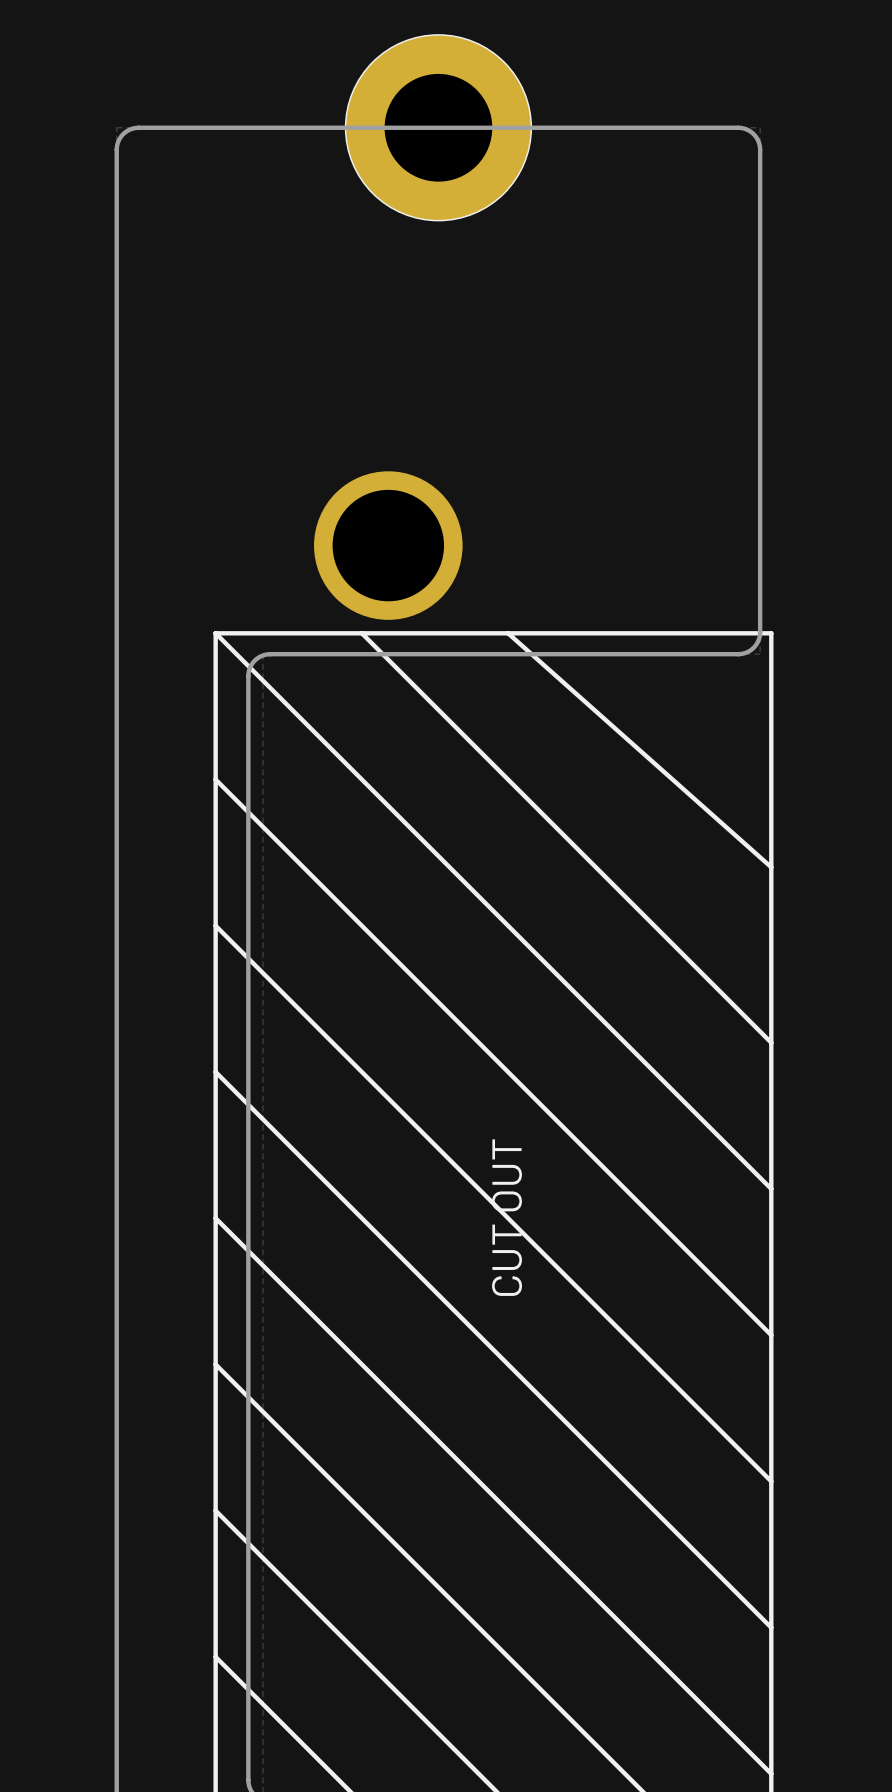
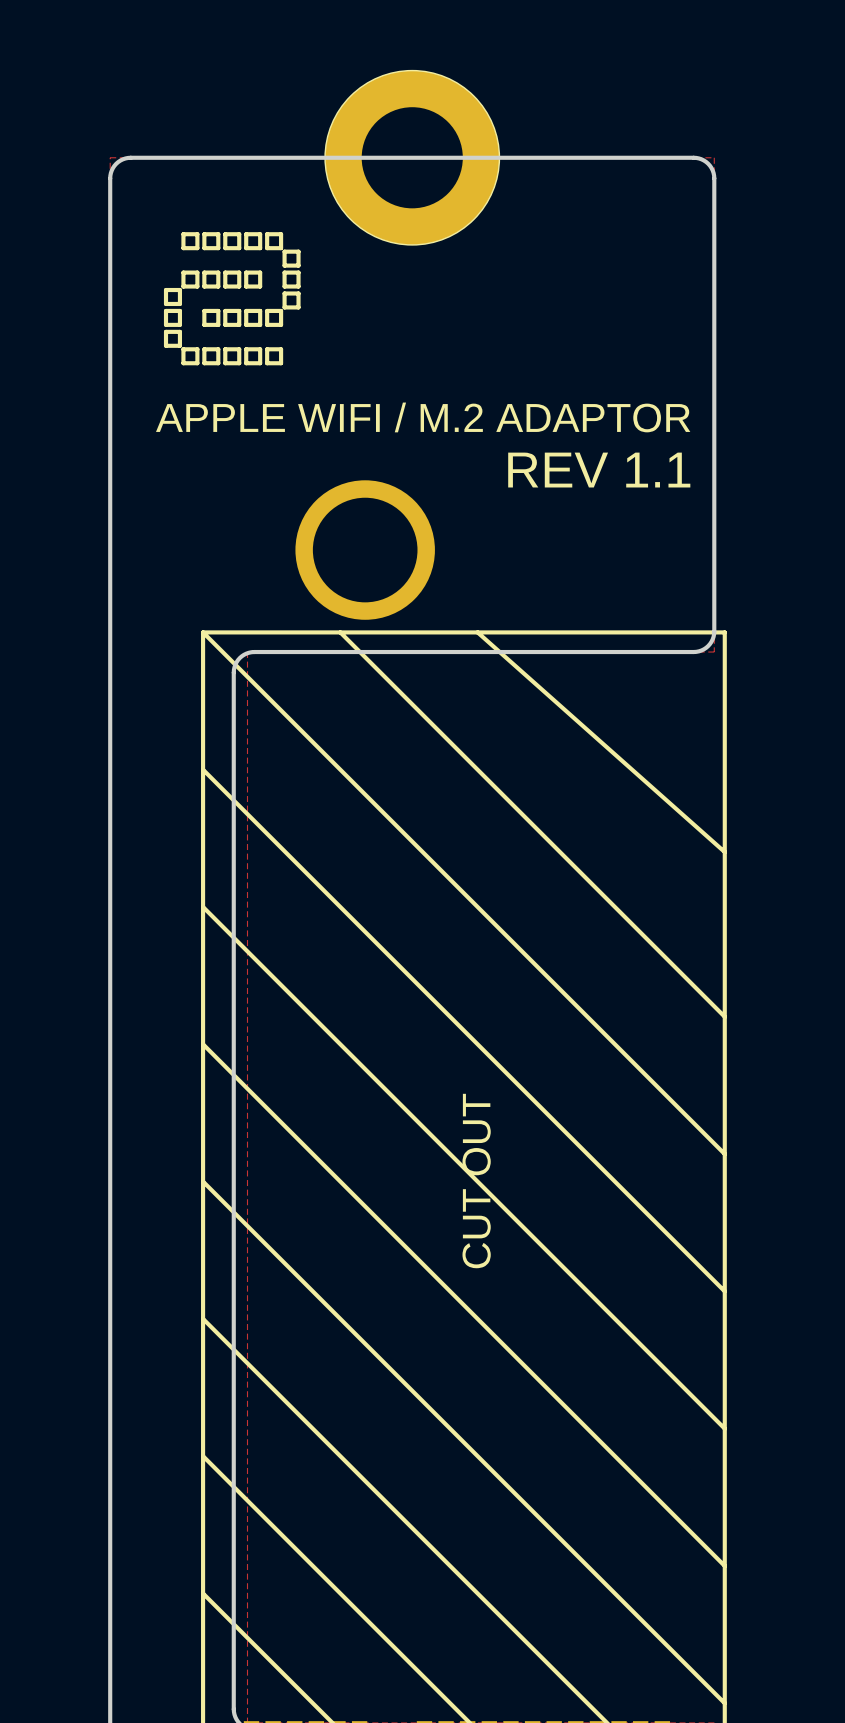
drawing: none -> [163, 232, 301, 366]
text: none -> APPLE WIFI / M.2 ADAPTOR (423, 417)
text: none -> REV 1.1 (599, 470)

